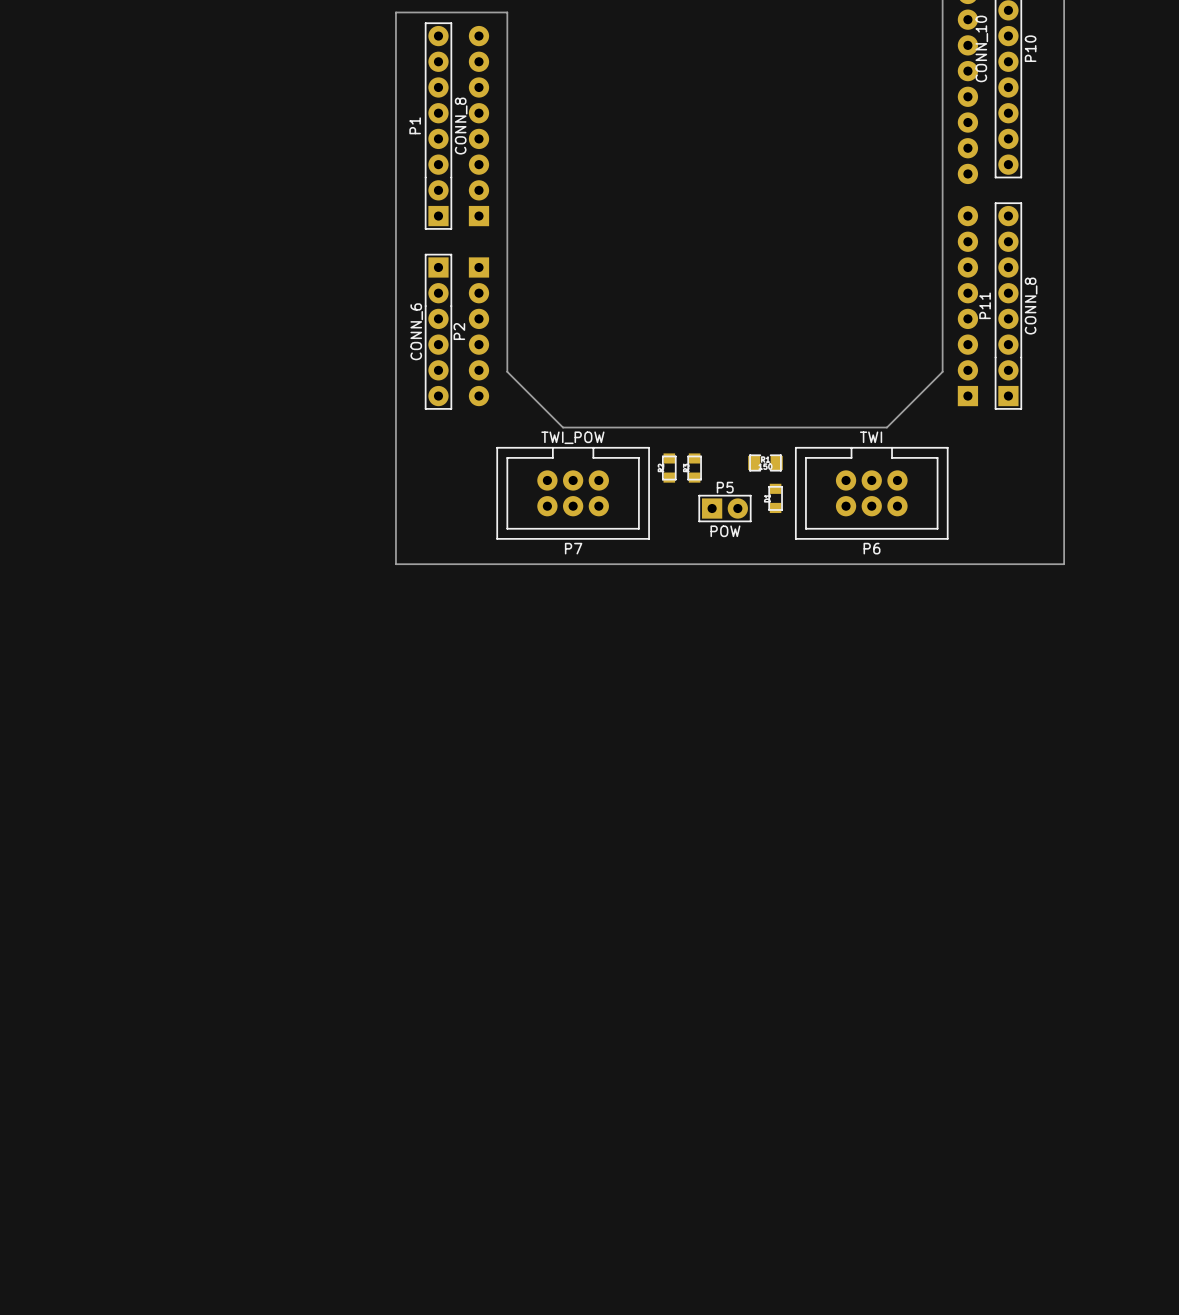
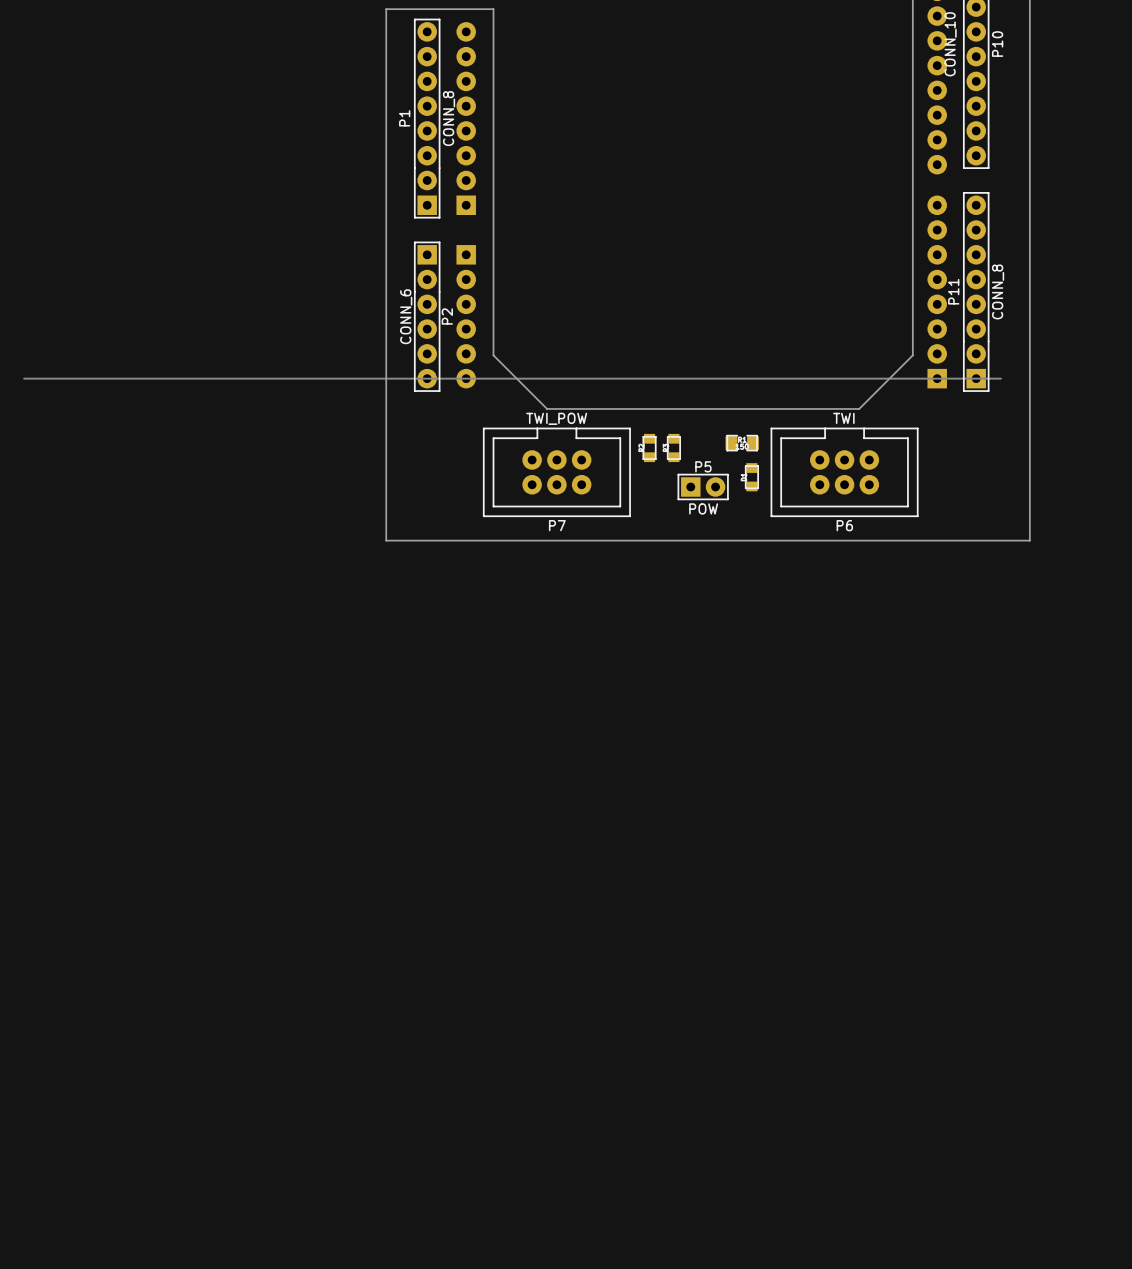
line: none -> (24, 378) (1000, 378)

